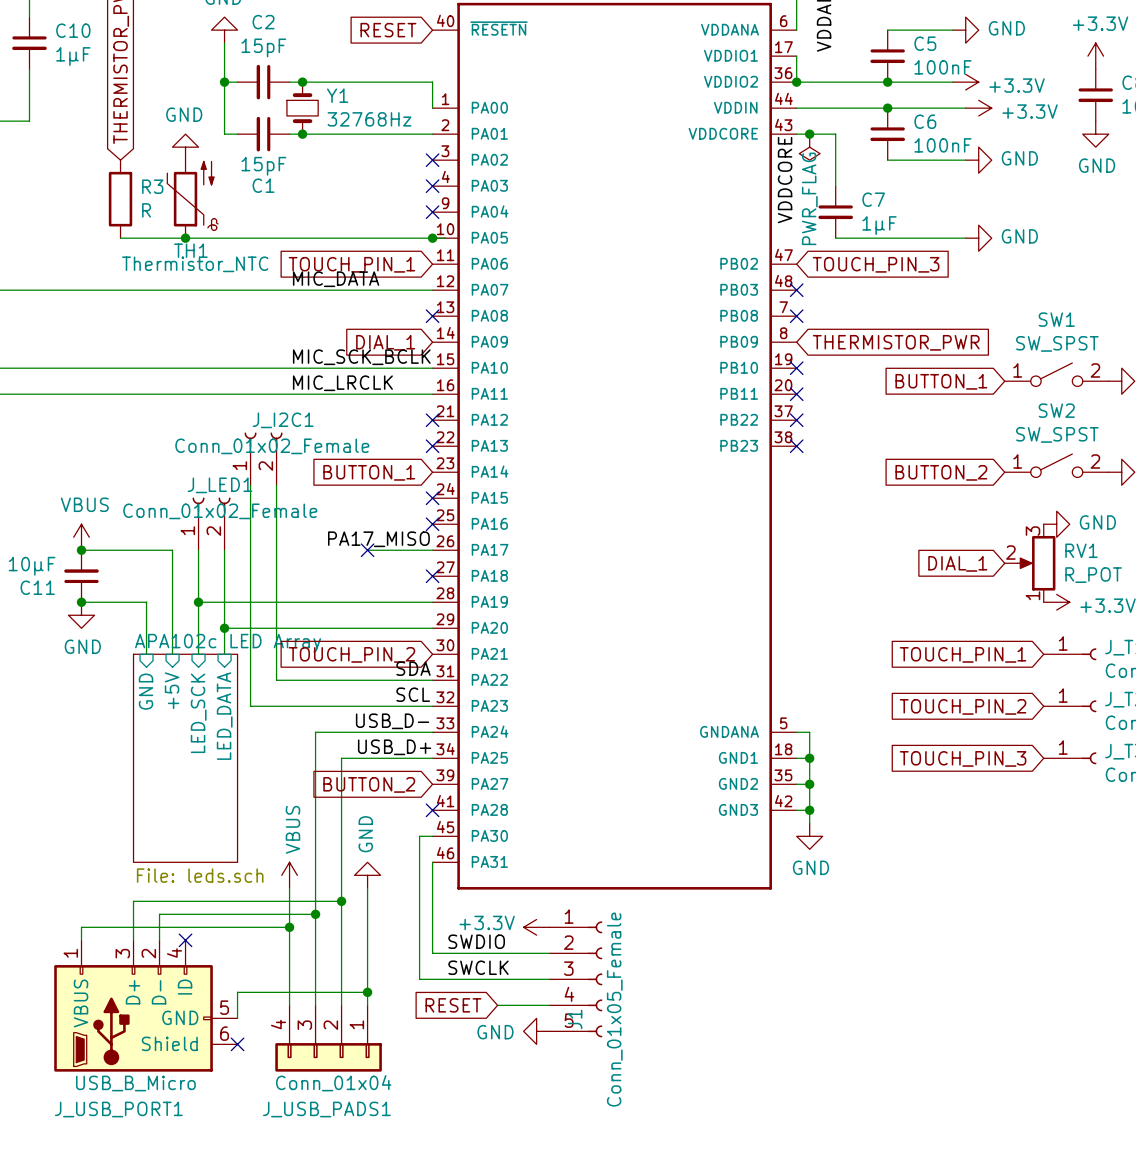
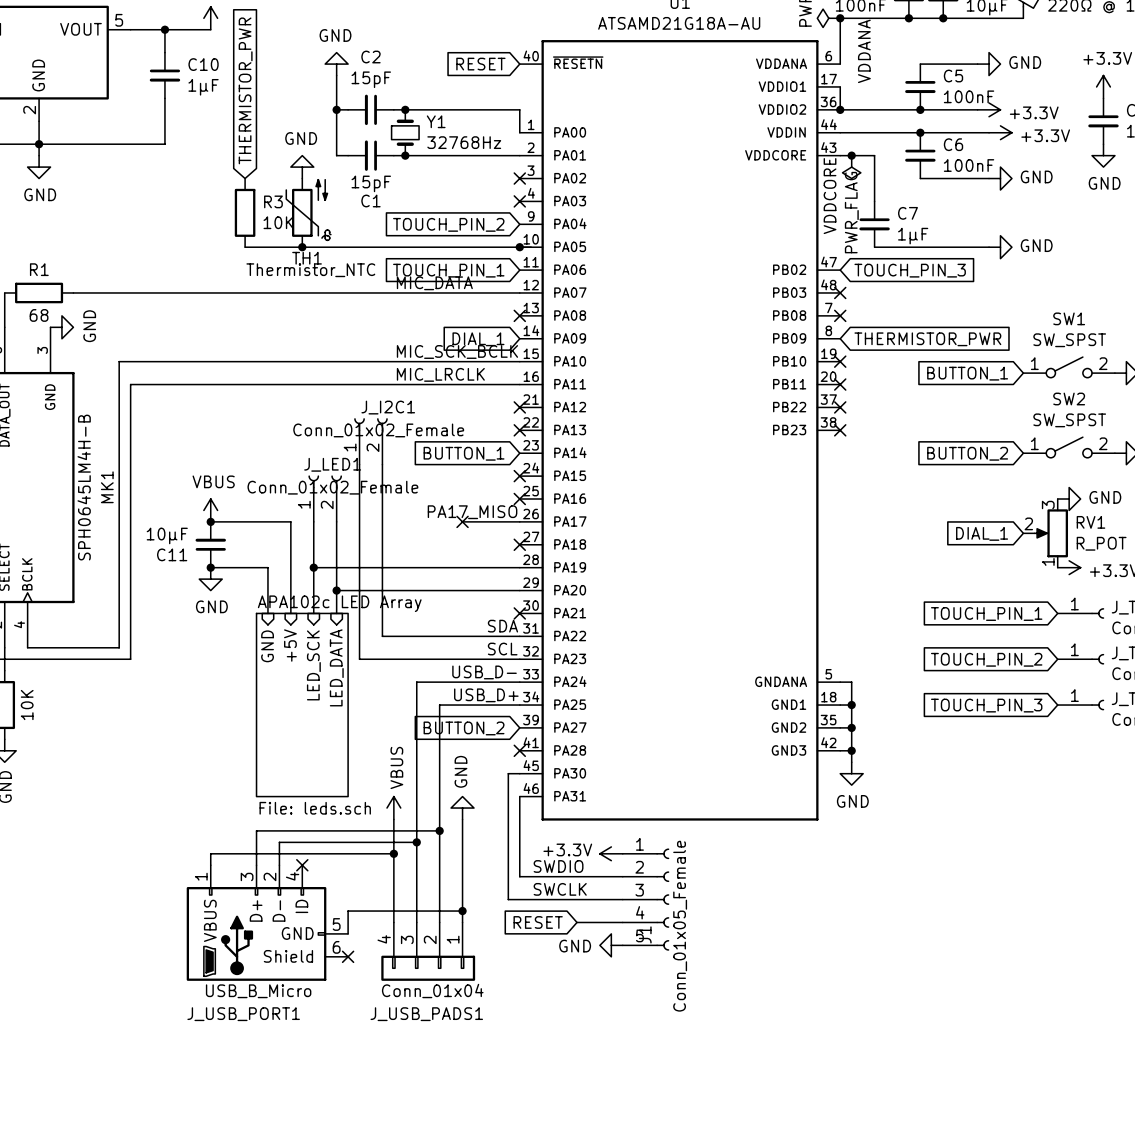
R3 value: R (146, 210) -> 10K (278, 222)
global label: none -> TOUCH_PIN_2 (448, 224)
no-connect mark: (432, 212) -> none
global label: TOUCH_PIN_2 (351, 654) -> none
no-connect mark: none -> (519, 613)

